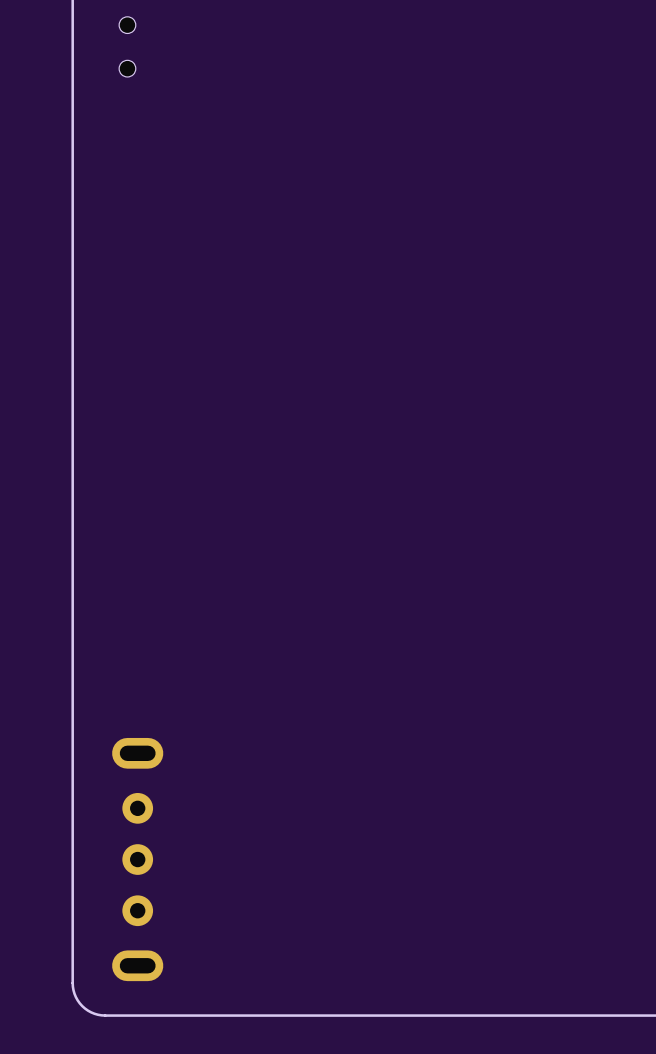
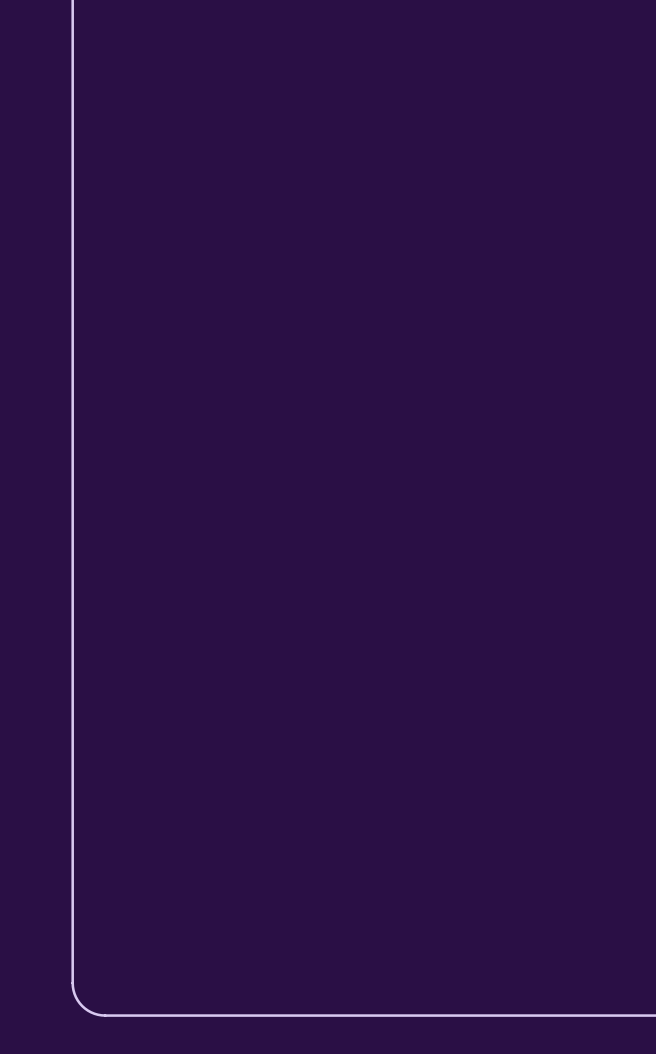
part: (127, 46) -> none
part: (137, 859) -> none

